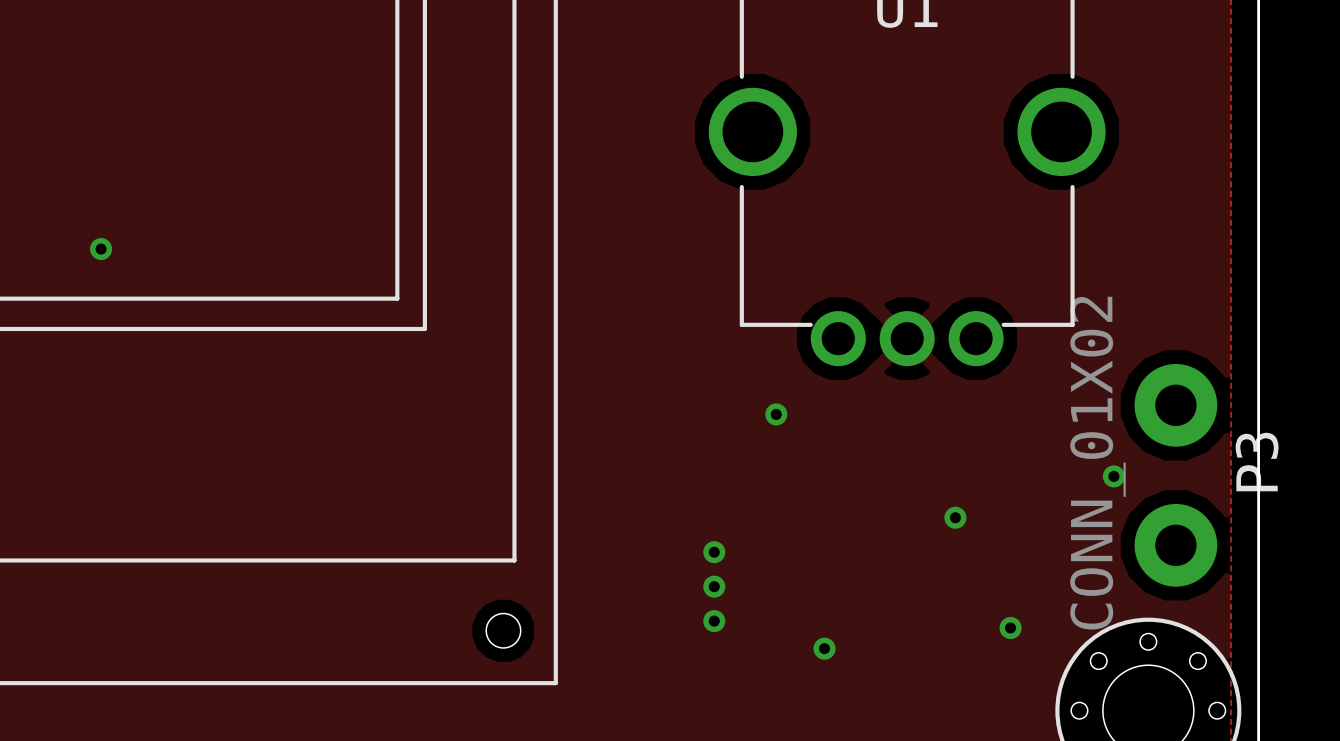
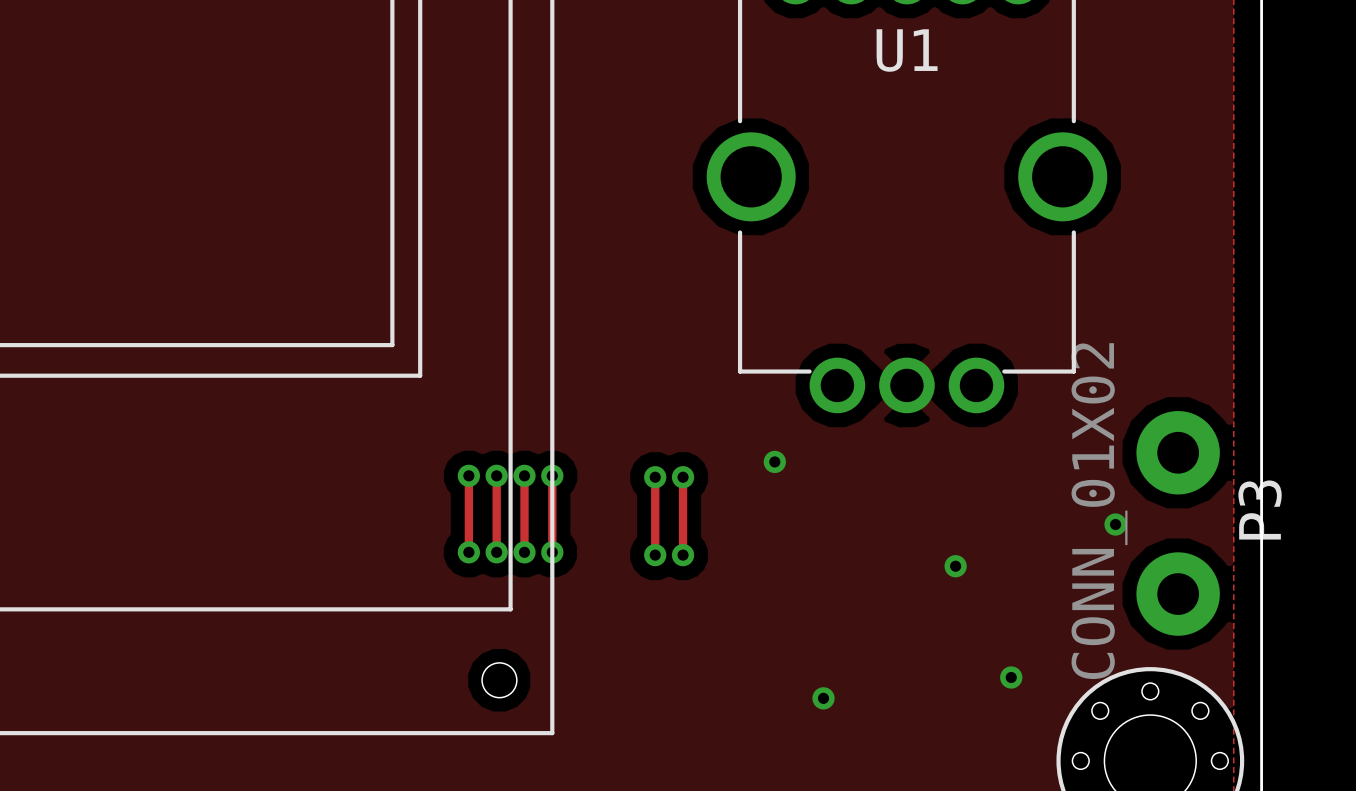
via: (101, 249) -> none
track: none -> (468, 475) (468, 552)
via: none -> (468, 475)
track: none -> (496, 475) (496, 552)
via: none -> (496, 475)
track: none -> (524, 475) (524, 552)
via: none -> (524, 475)
track: none -> (552, 475) (552, 552)
via: none -> (552, 475)
track: none -> (655, 477) (655, 555)
via: none -> (655, 477)
track: none -> (683, 477) (683, 555)
via: none -> (683, 477)
via: none -> (468, 552)
via: none -> (496, 552)
via: none -> (524, 552)
via: none -> (552, 552)
via: none -> (655, 555)
via: none -> (683, 555)
via: (714, 552) -> none
via: (714, 586) -> none
via: (714, 621) -> none

